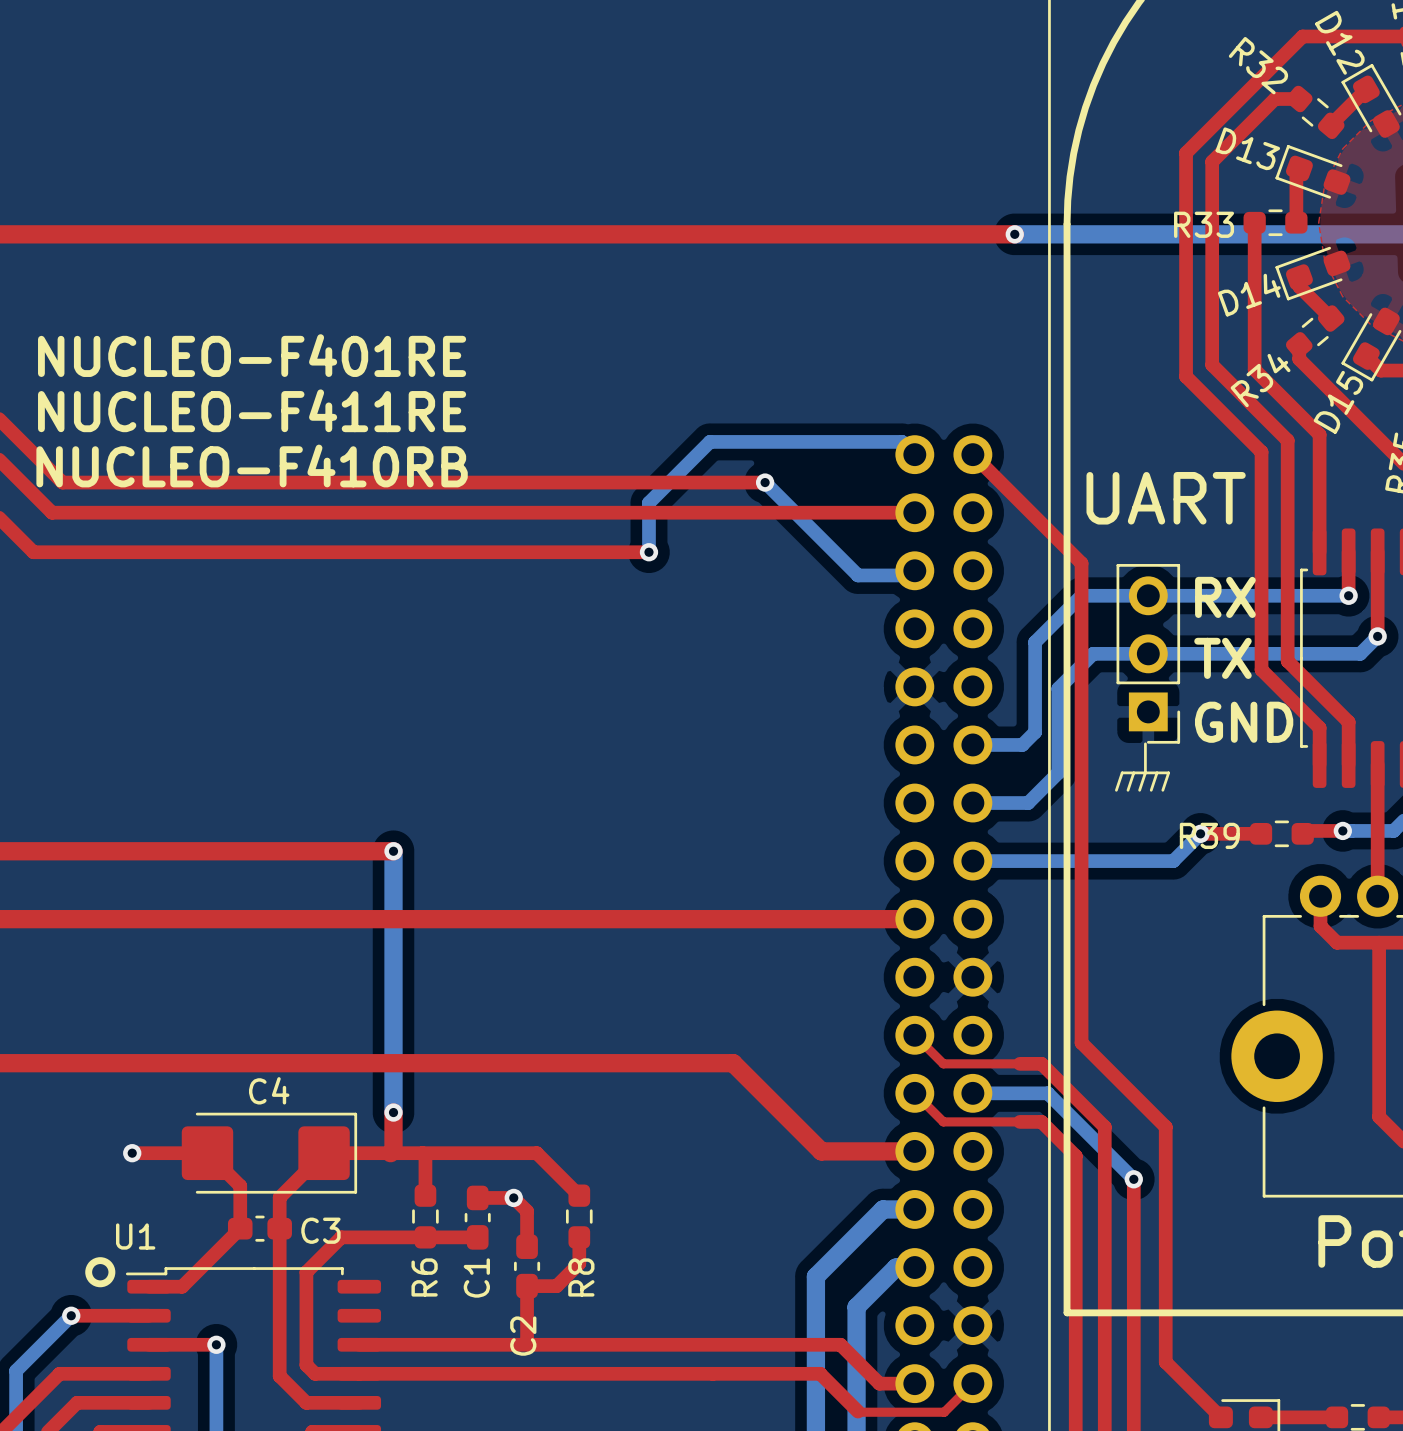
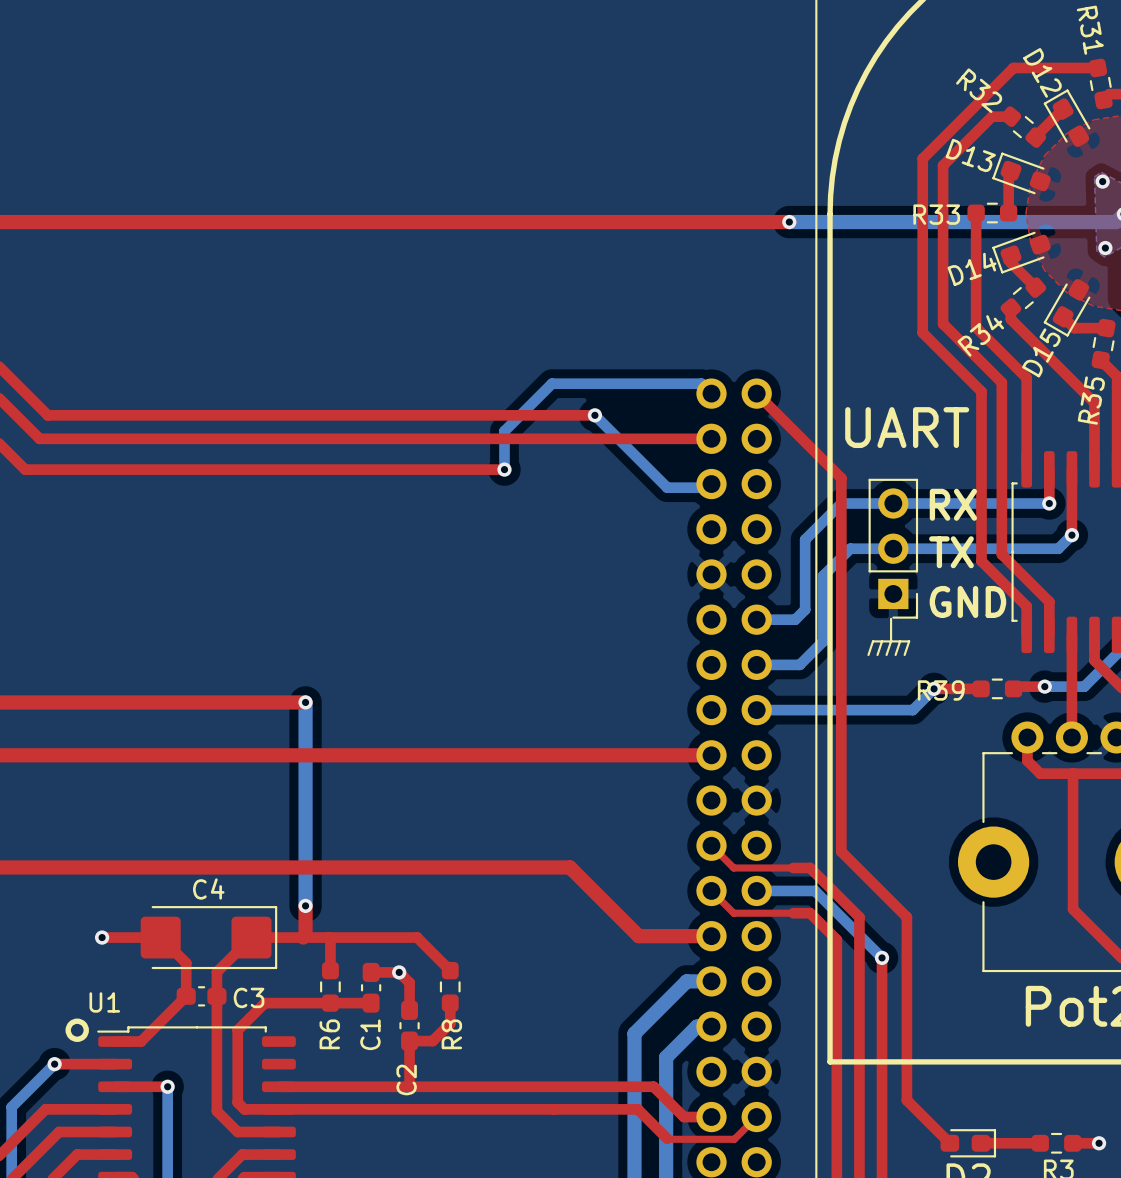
text: NUCLEO-F401RE (252, 355) -> none
text: NUCLEO-F411RE (252, 410) -> none
text: NUCLEO-F410RB (252, 465) -> none

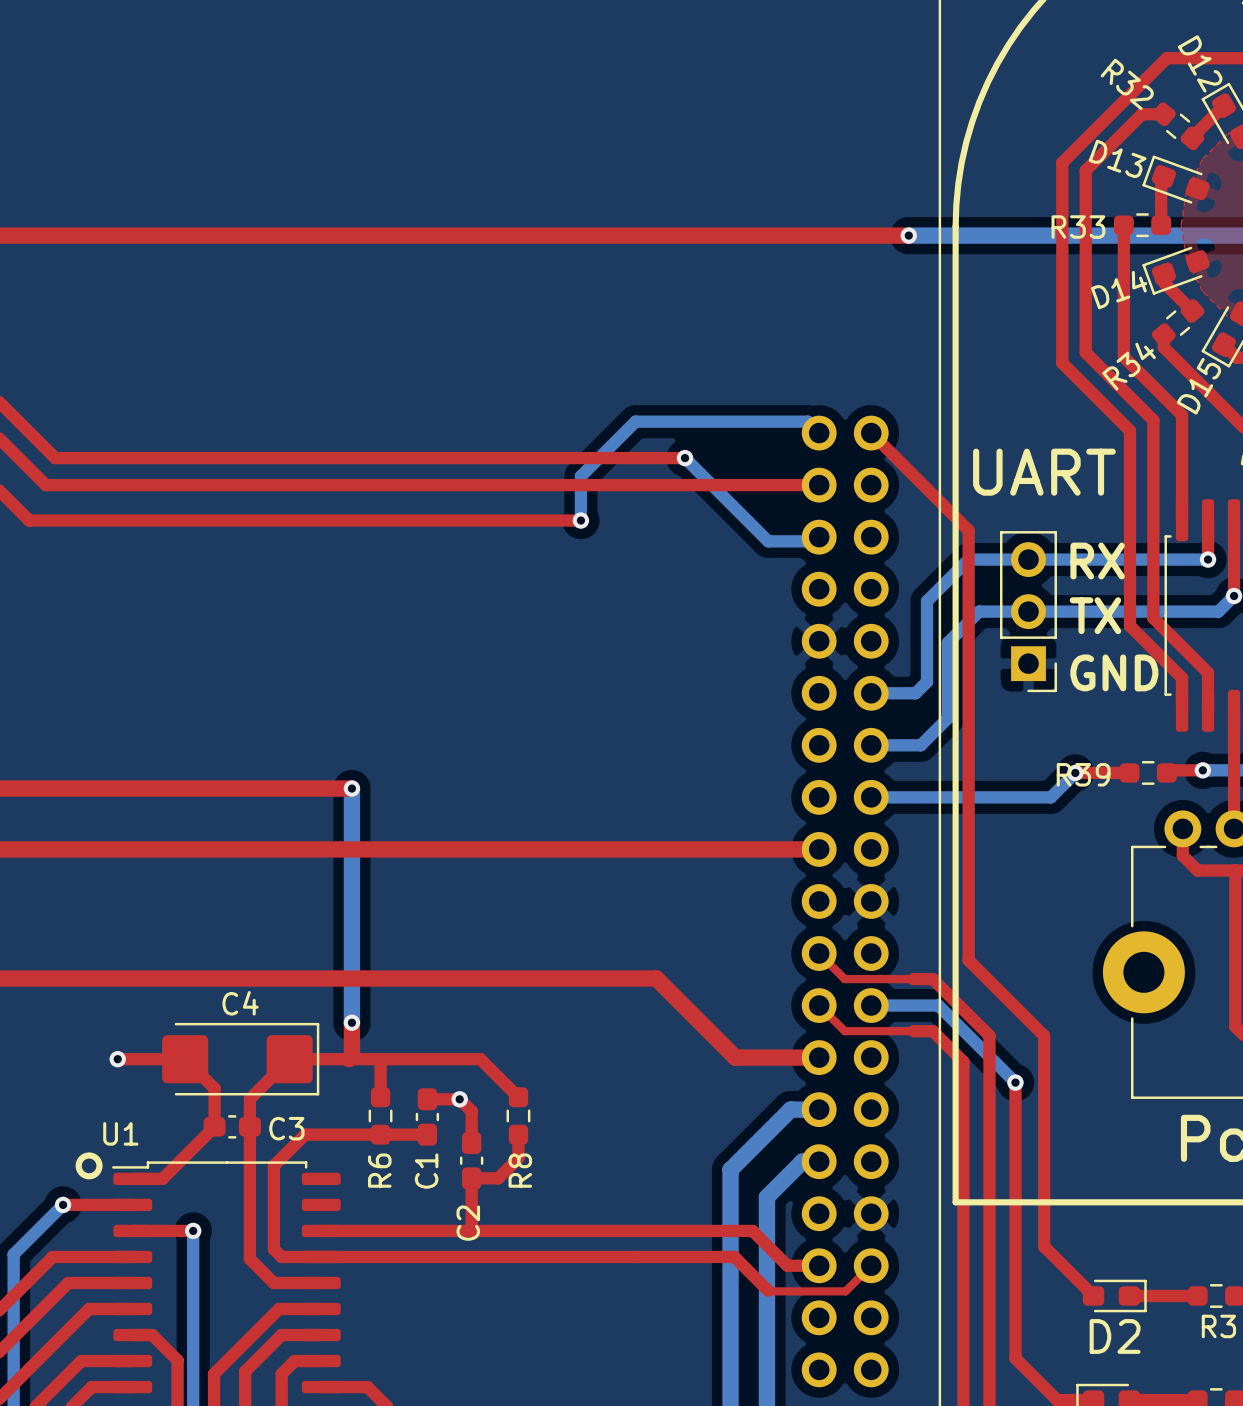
line: (891, 618) (891, 641) (886, 654) -> none
line: (882, 641) (877, 654) -> none
line: (900, 641) (895, 654) -> none
line: (868, 654) (872, 641) (909, 641) (904, 654) -> none

